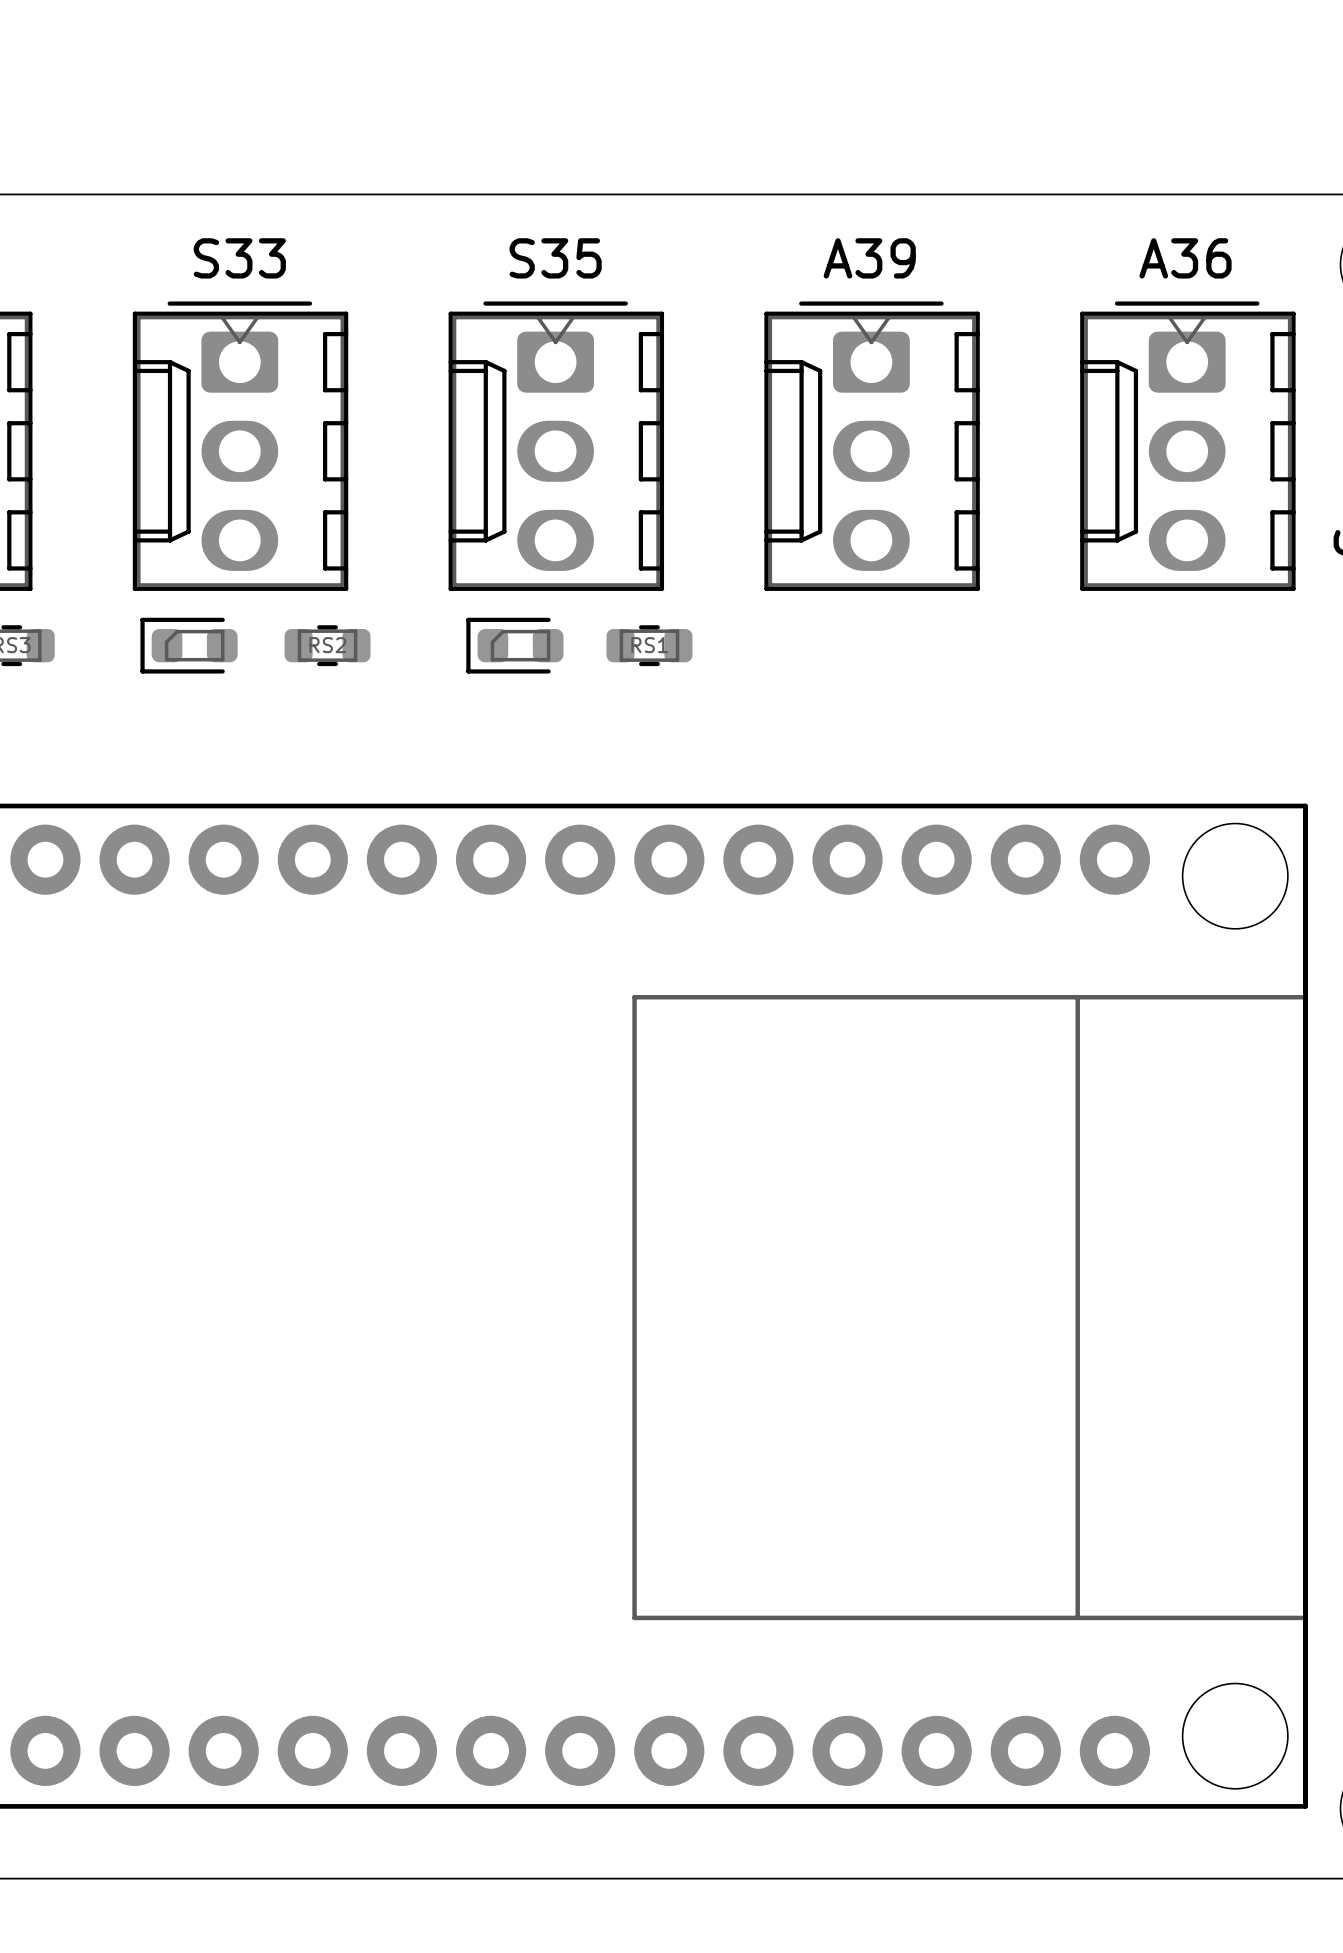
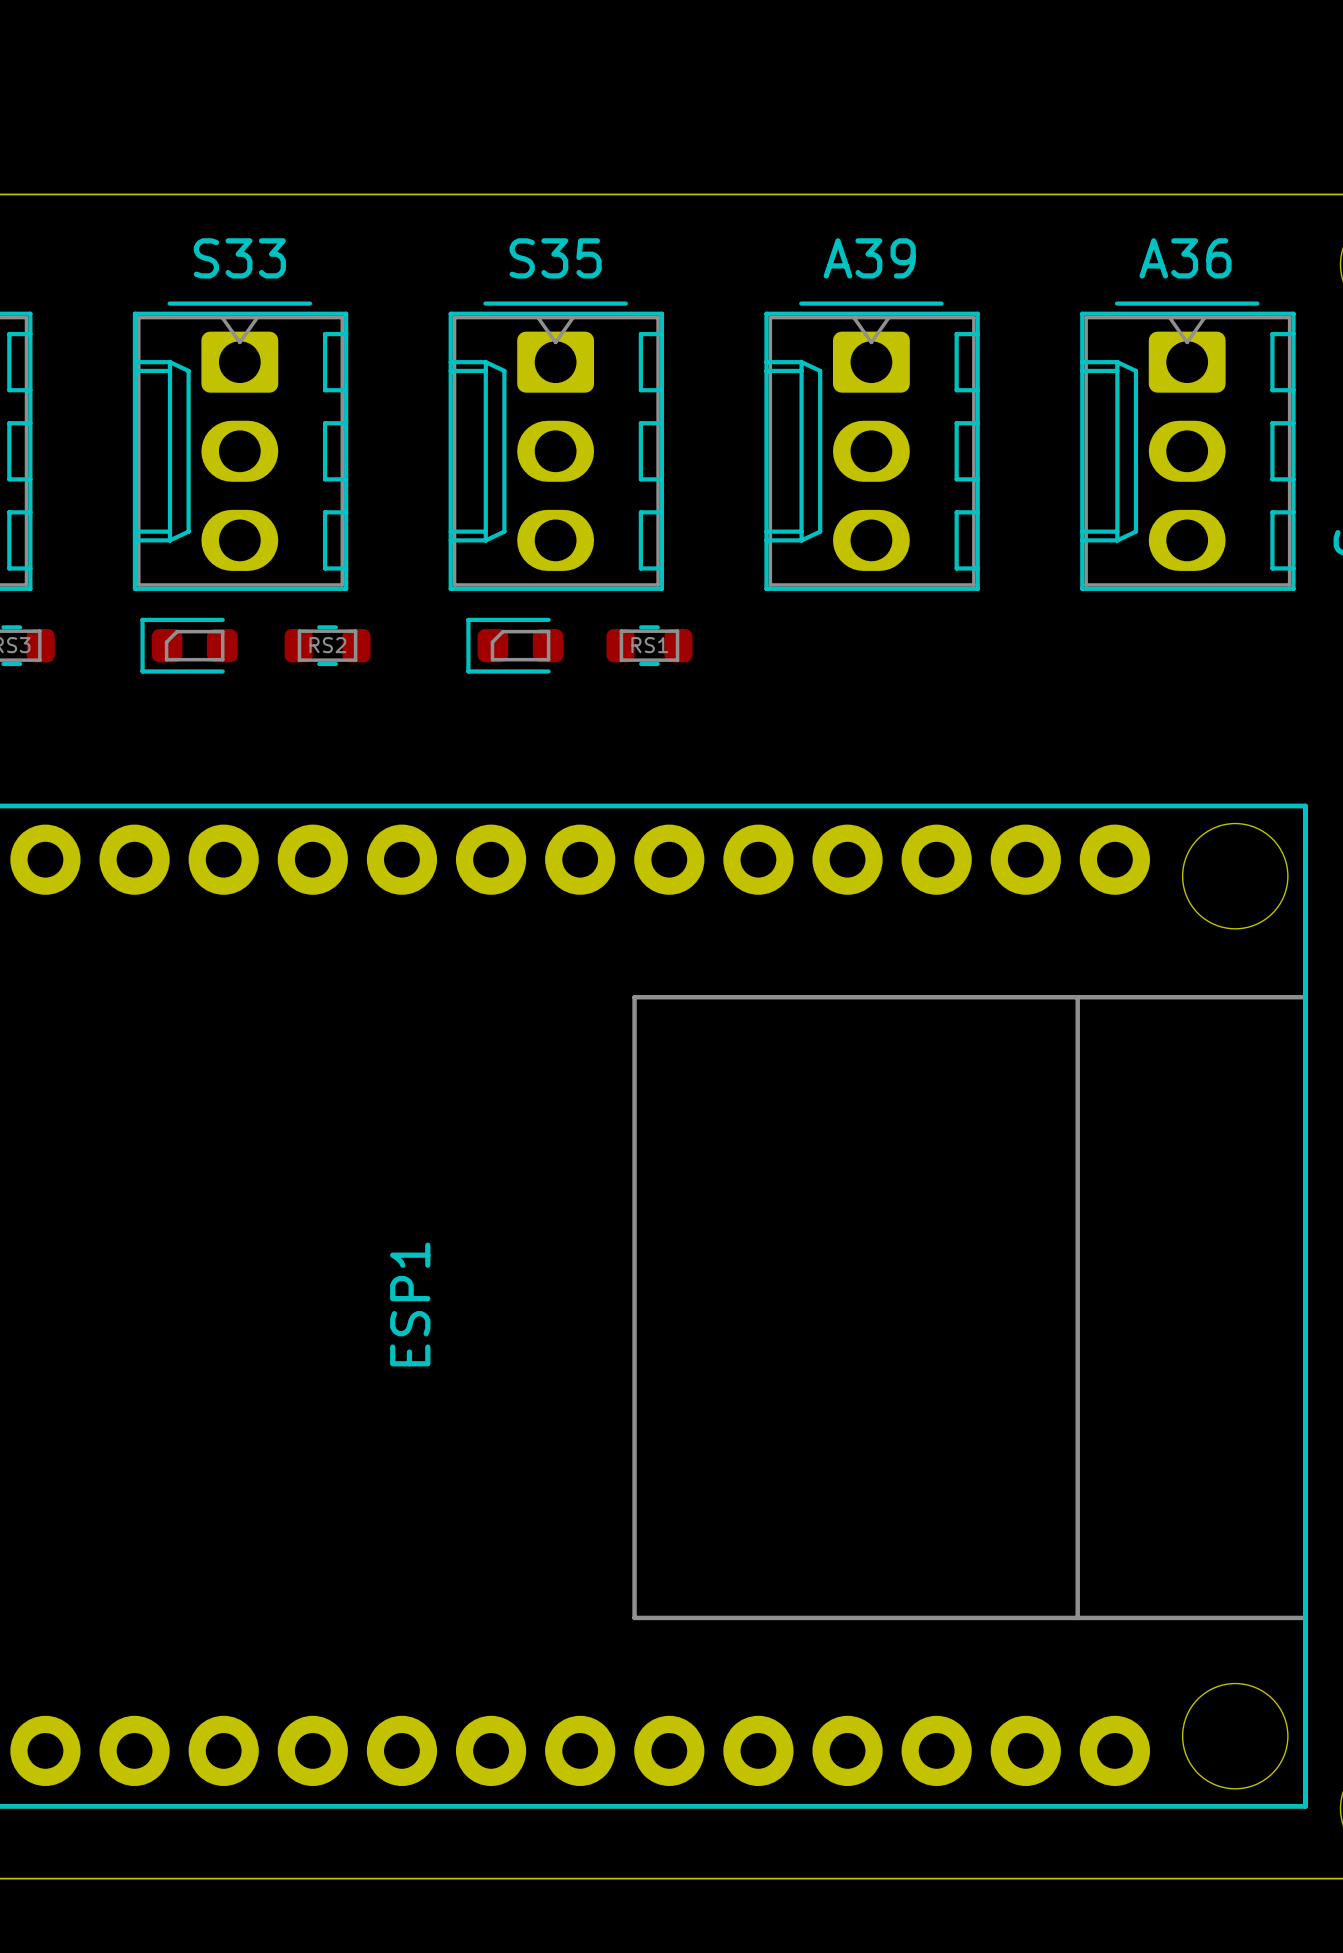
ESP1 name: none -> ESP1 (410, 1304)

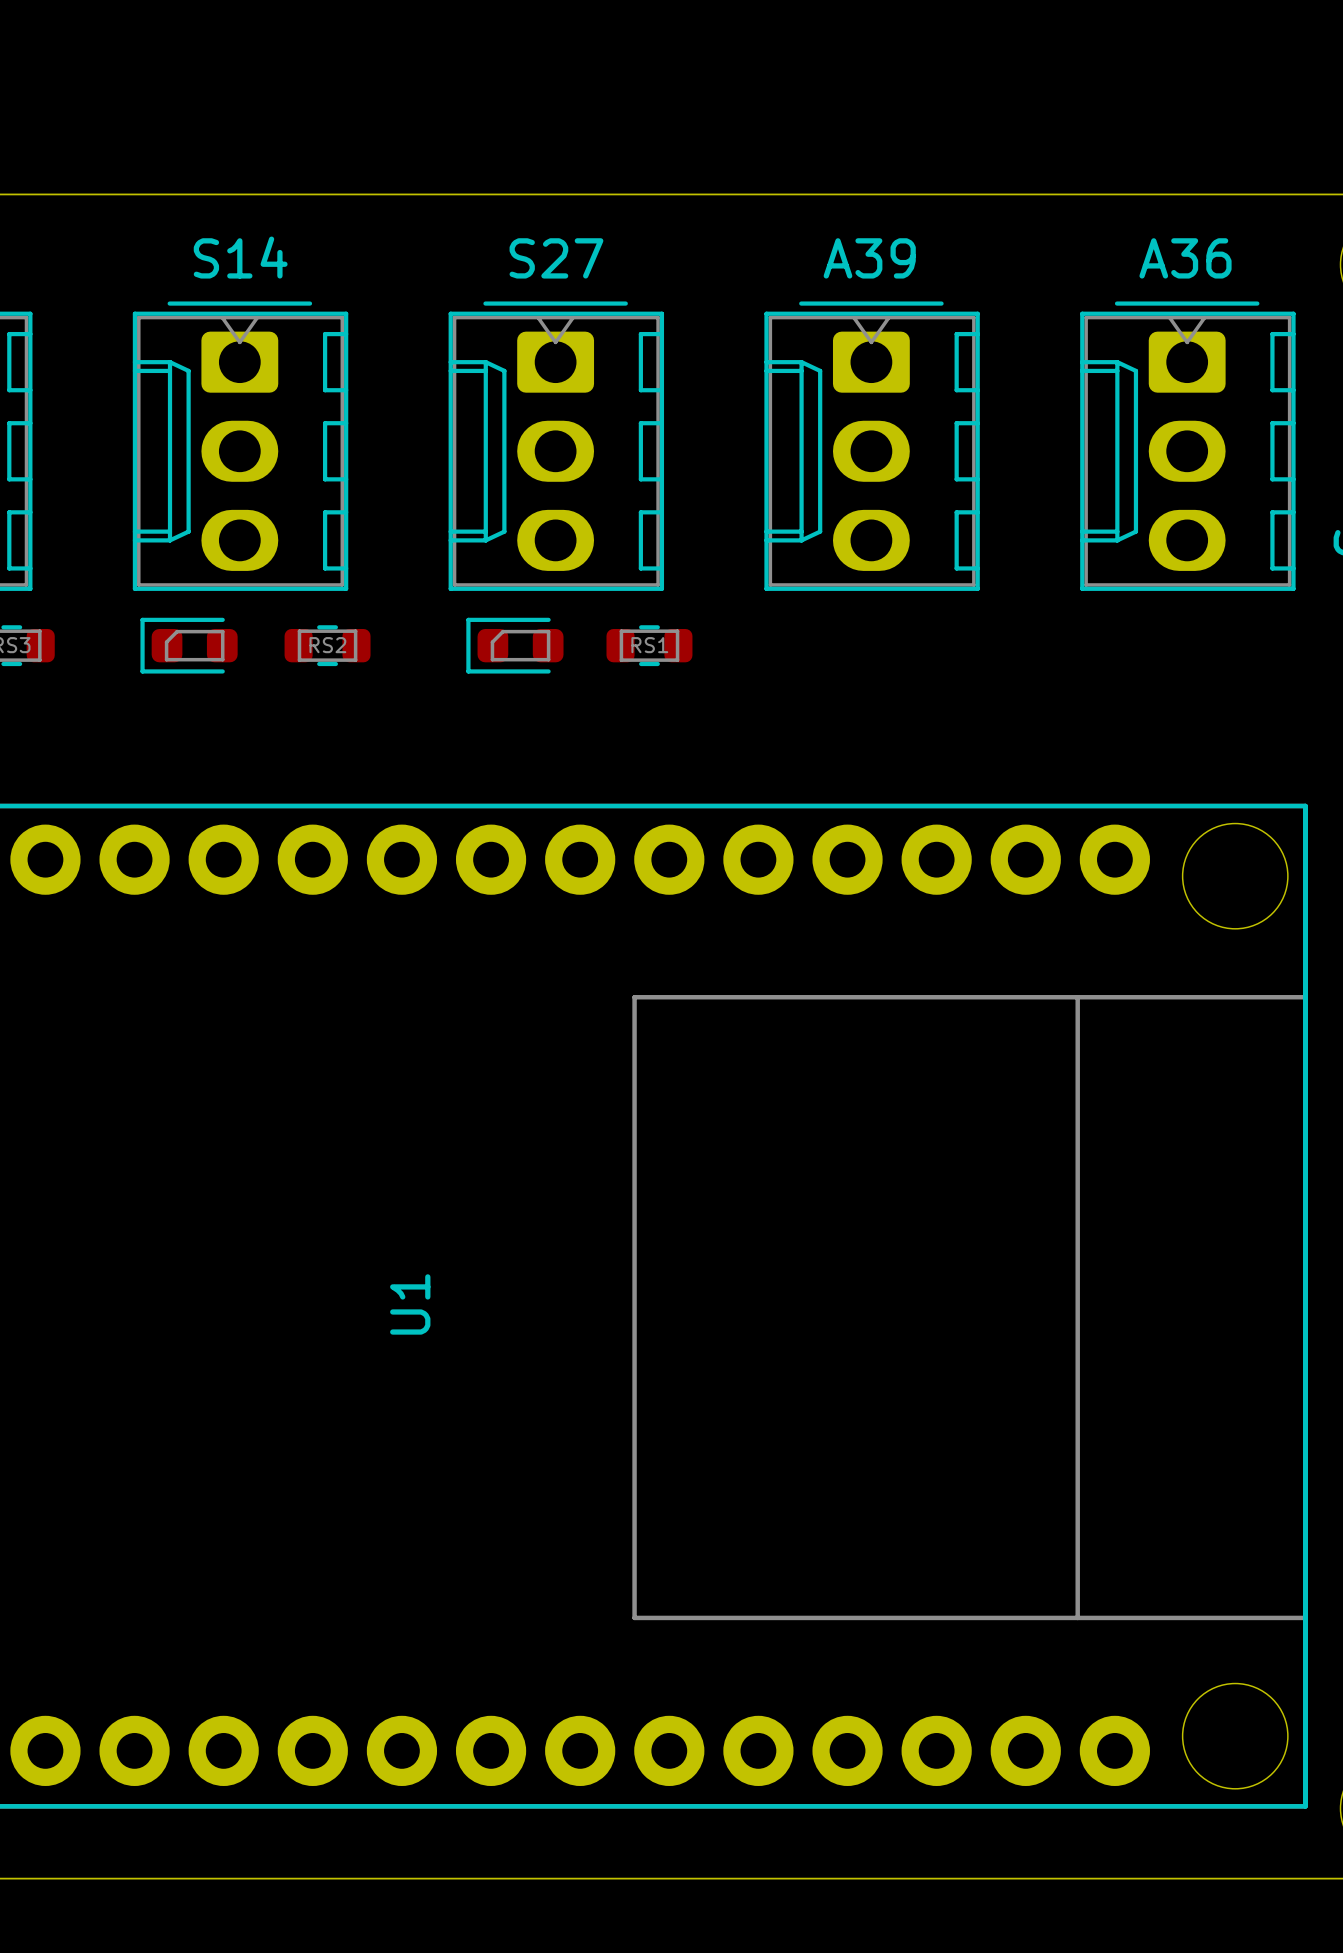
S33 name: S33 (239, 258) -> S14 (240, 257)
S35 name: S35 (555, 258) -> S27 (556, 258)
ESP1 name: ESP1 (410, 1304) -> U1 (410, 1304)

